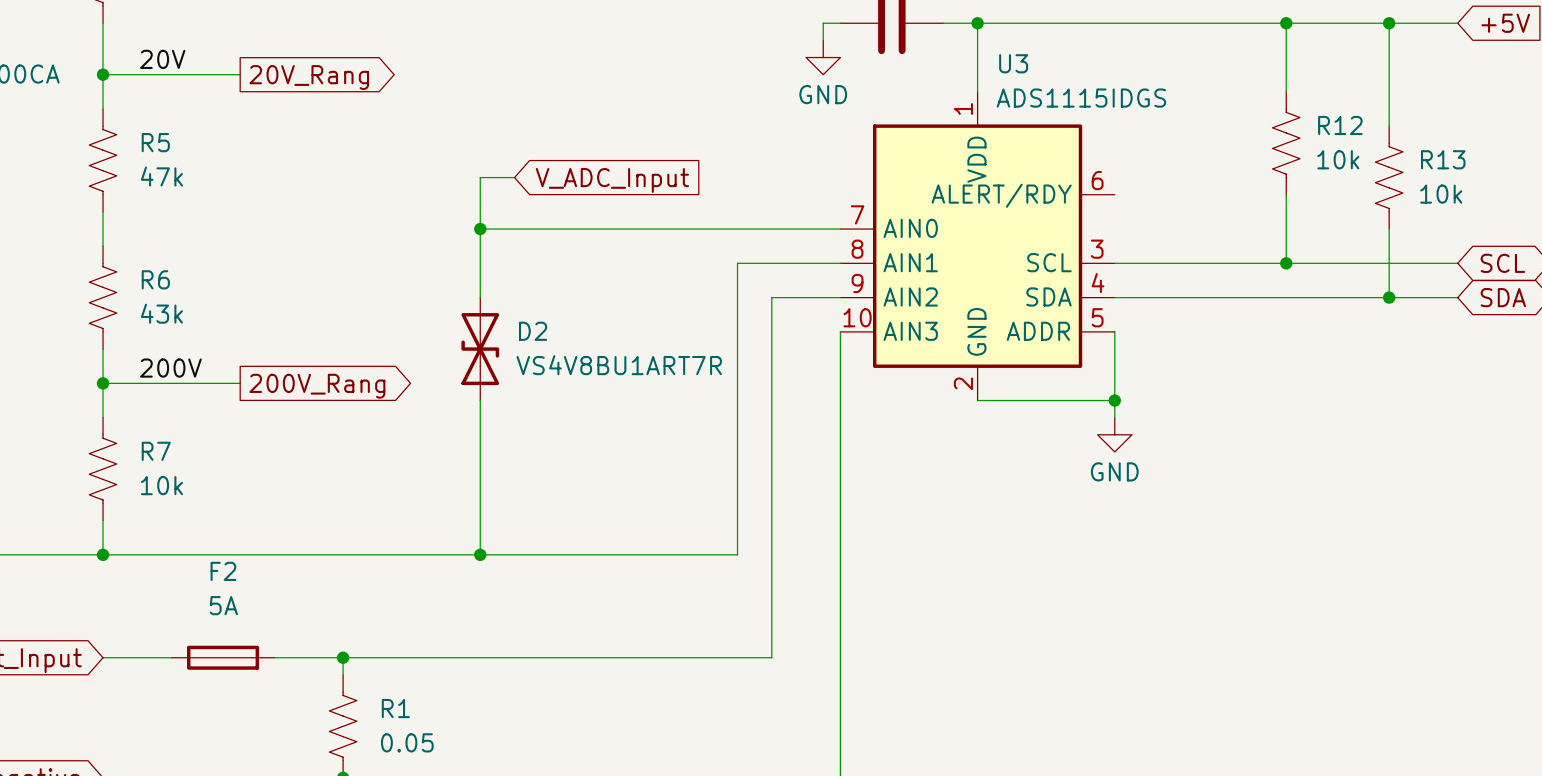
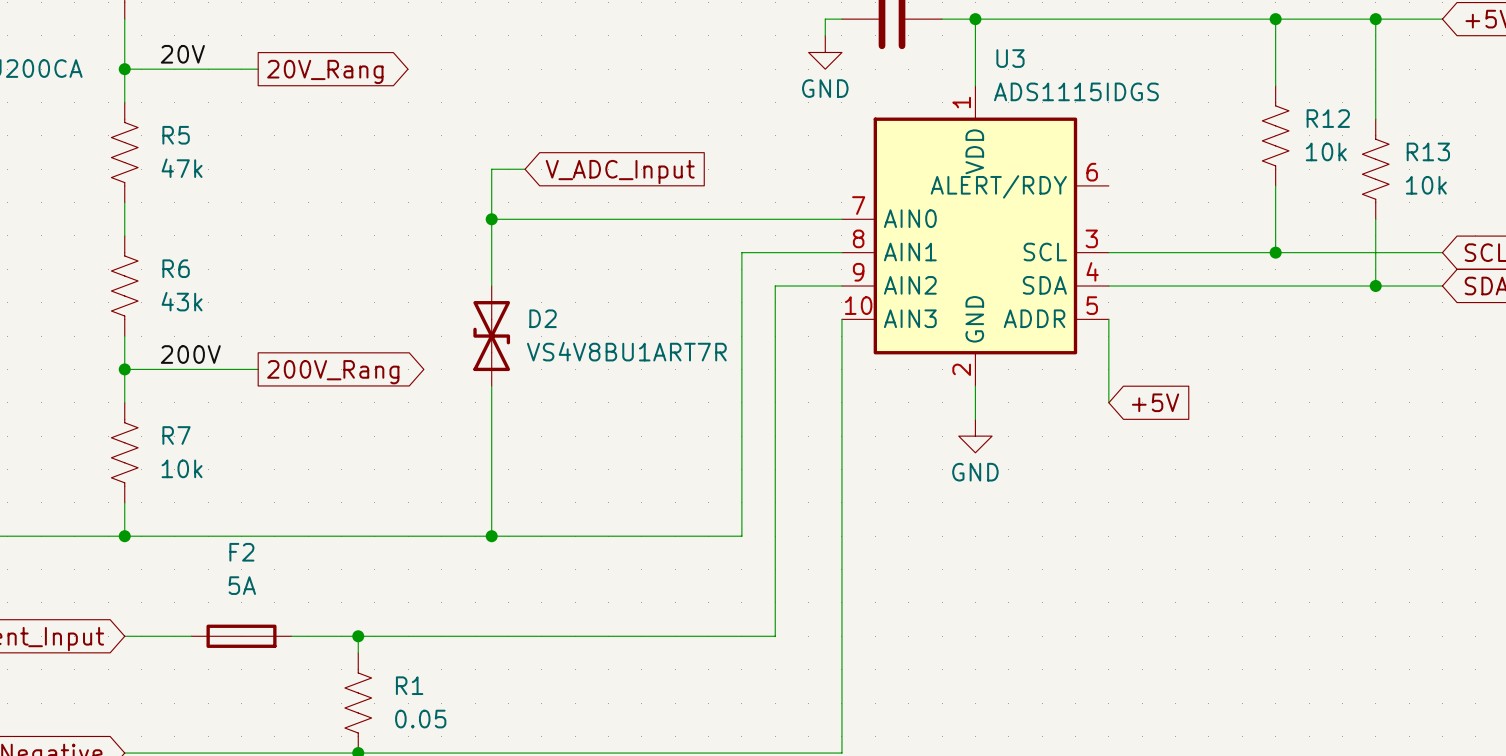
wire: (977, 400) (1114, 400) -> (975, 386) (975, 419)
junction: (1114, 400) -> none
global label: none -> +5V (1155, 402)
power symbol position: GND (1114, 434) -> GND (975, 436)

